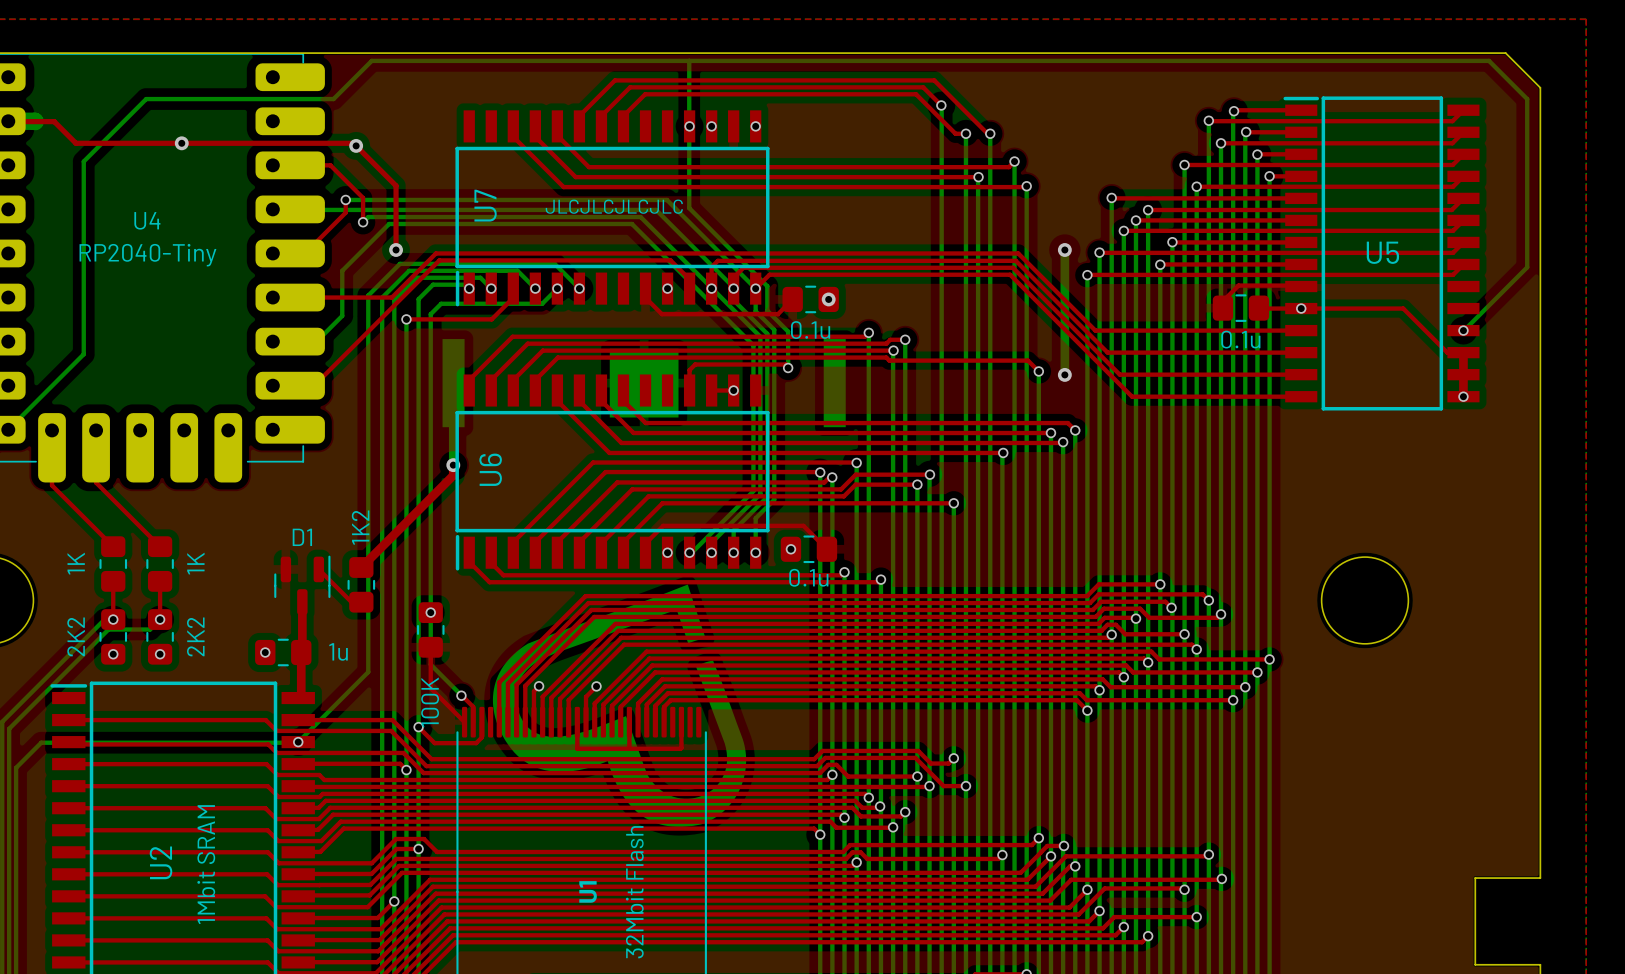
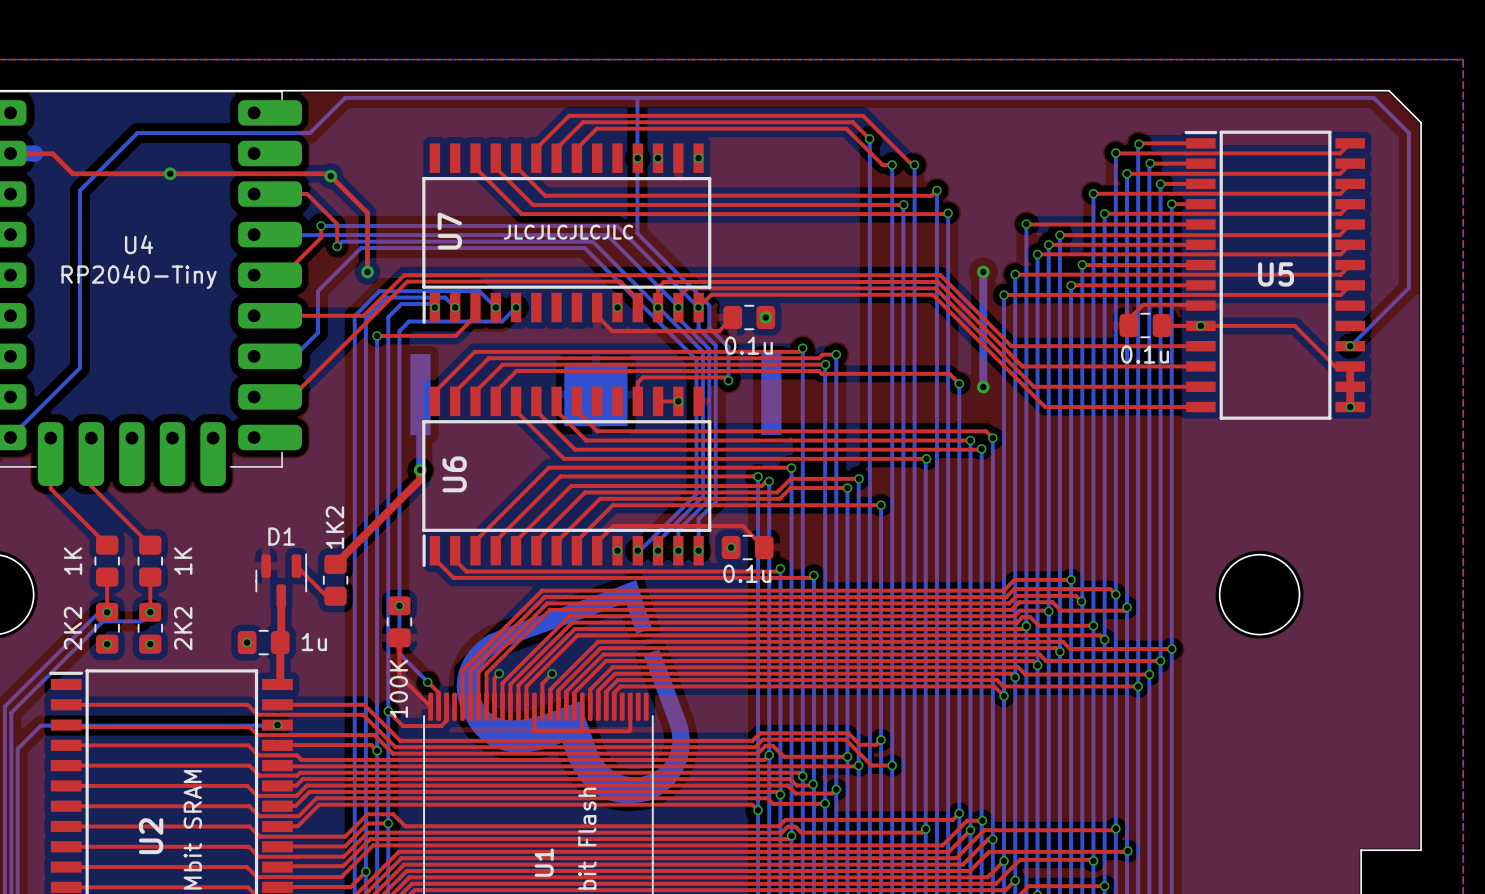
bottom track: (579, 288) (554, 263) (399, 263) (368, 295) (368, 672) (298, 742) -> none
via: (579, 288) -> none

